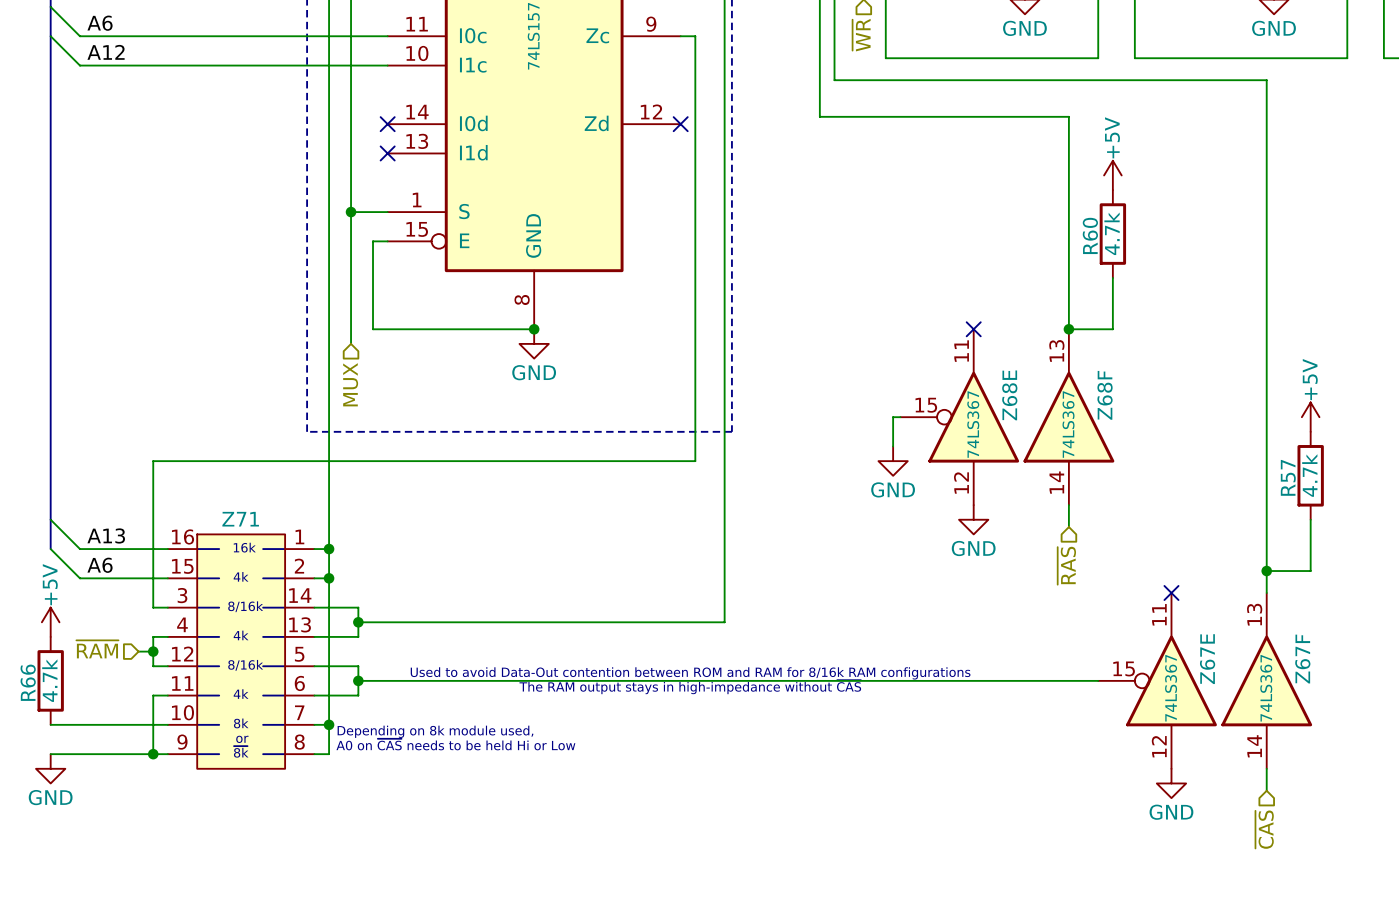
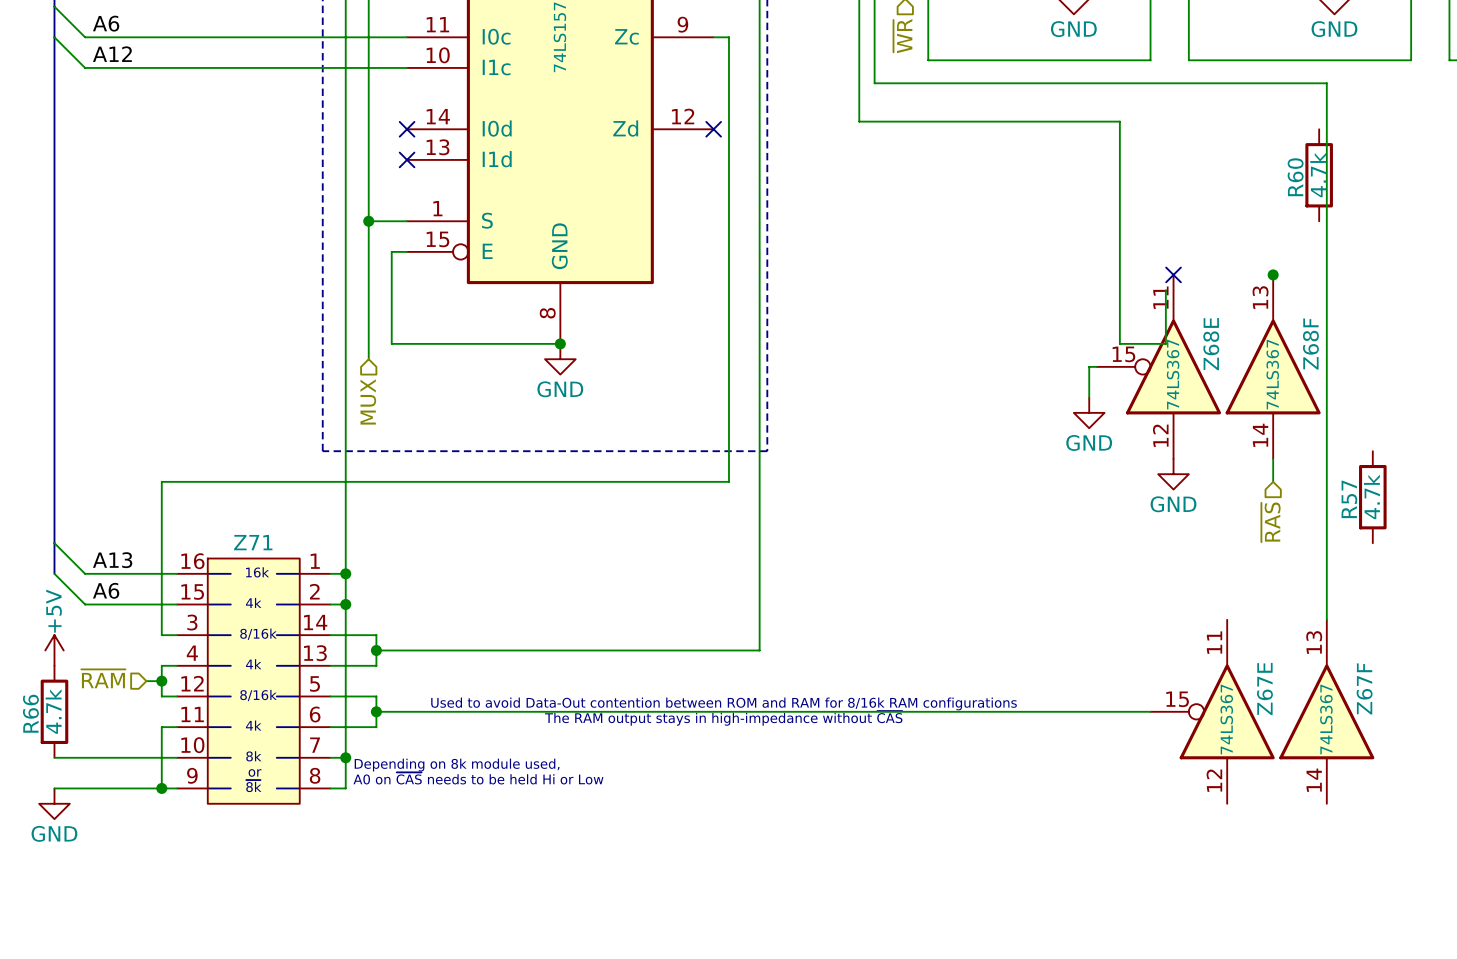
power symbol: +5V (1112, 175) -> none
R60 position: (1112, 234) -> (1319, 175)
no-connect mark: none -> (1173, 274)
junction: none -> (1273, 274)
no-connect mark: (973, 329) -> none
junction: (1068, 329) -> none
power symbol: none -> GND (1089, 412)
wire: (900, 417) (893, 417) (893, 446) -> (1096, 366) (1089, 366) (1089, 397)
Z68E position: (959, 417) -> (1158, 366)
Z68F position: (1068, 417) -> (1273, 366)
power symbol: +5V (1310, 417) -> none
power symbol: none -> GND (1173, 474)
power symbol: GND (893, 461) -> none
wire: (1068, 505) (1068, 527) -> (1273, 458) (1273, 481)
power symbol: GND (973, 519) -> none
wire: (1310, 519) (1310, 571) (1266, 571) -> none
hierarchical label position: ~{RAS} (1066, 565) -> ~{RAS} (1270, 522)
junction: (1266, 571) -> none
no-connect mark: (1171, 592) -> none
wire: (1266, 768) (1266, 790) -> none
power symbol: GND (1171, 783) -> none
hierarchical label: ~{CAS} (1264, 829) -> none

